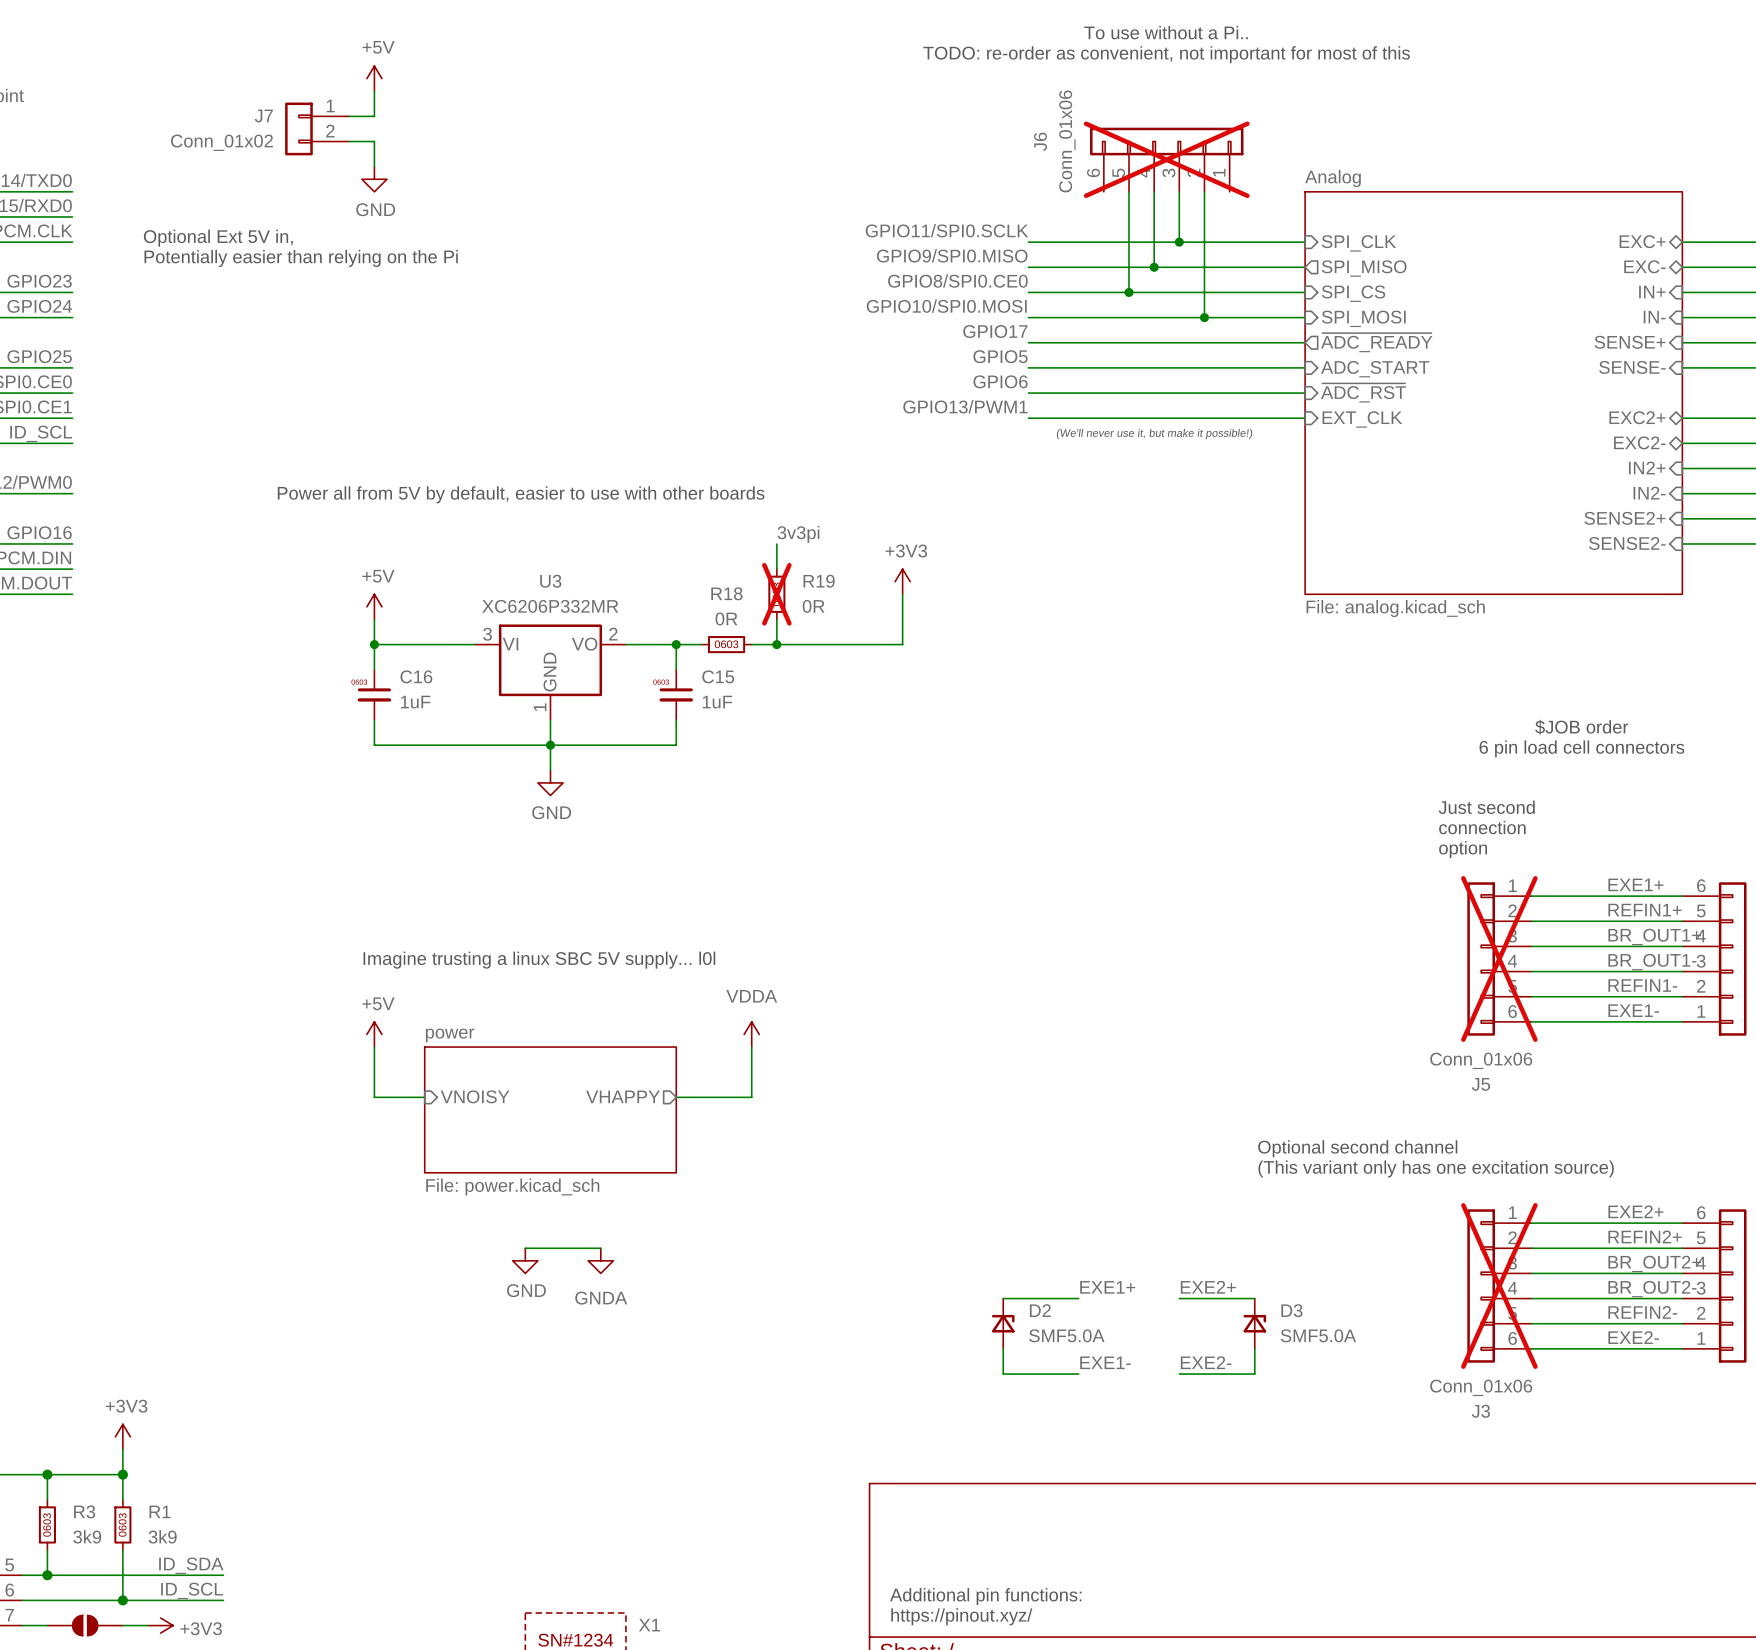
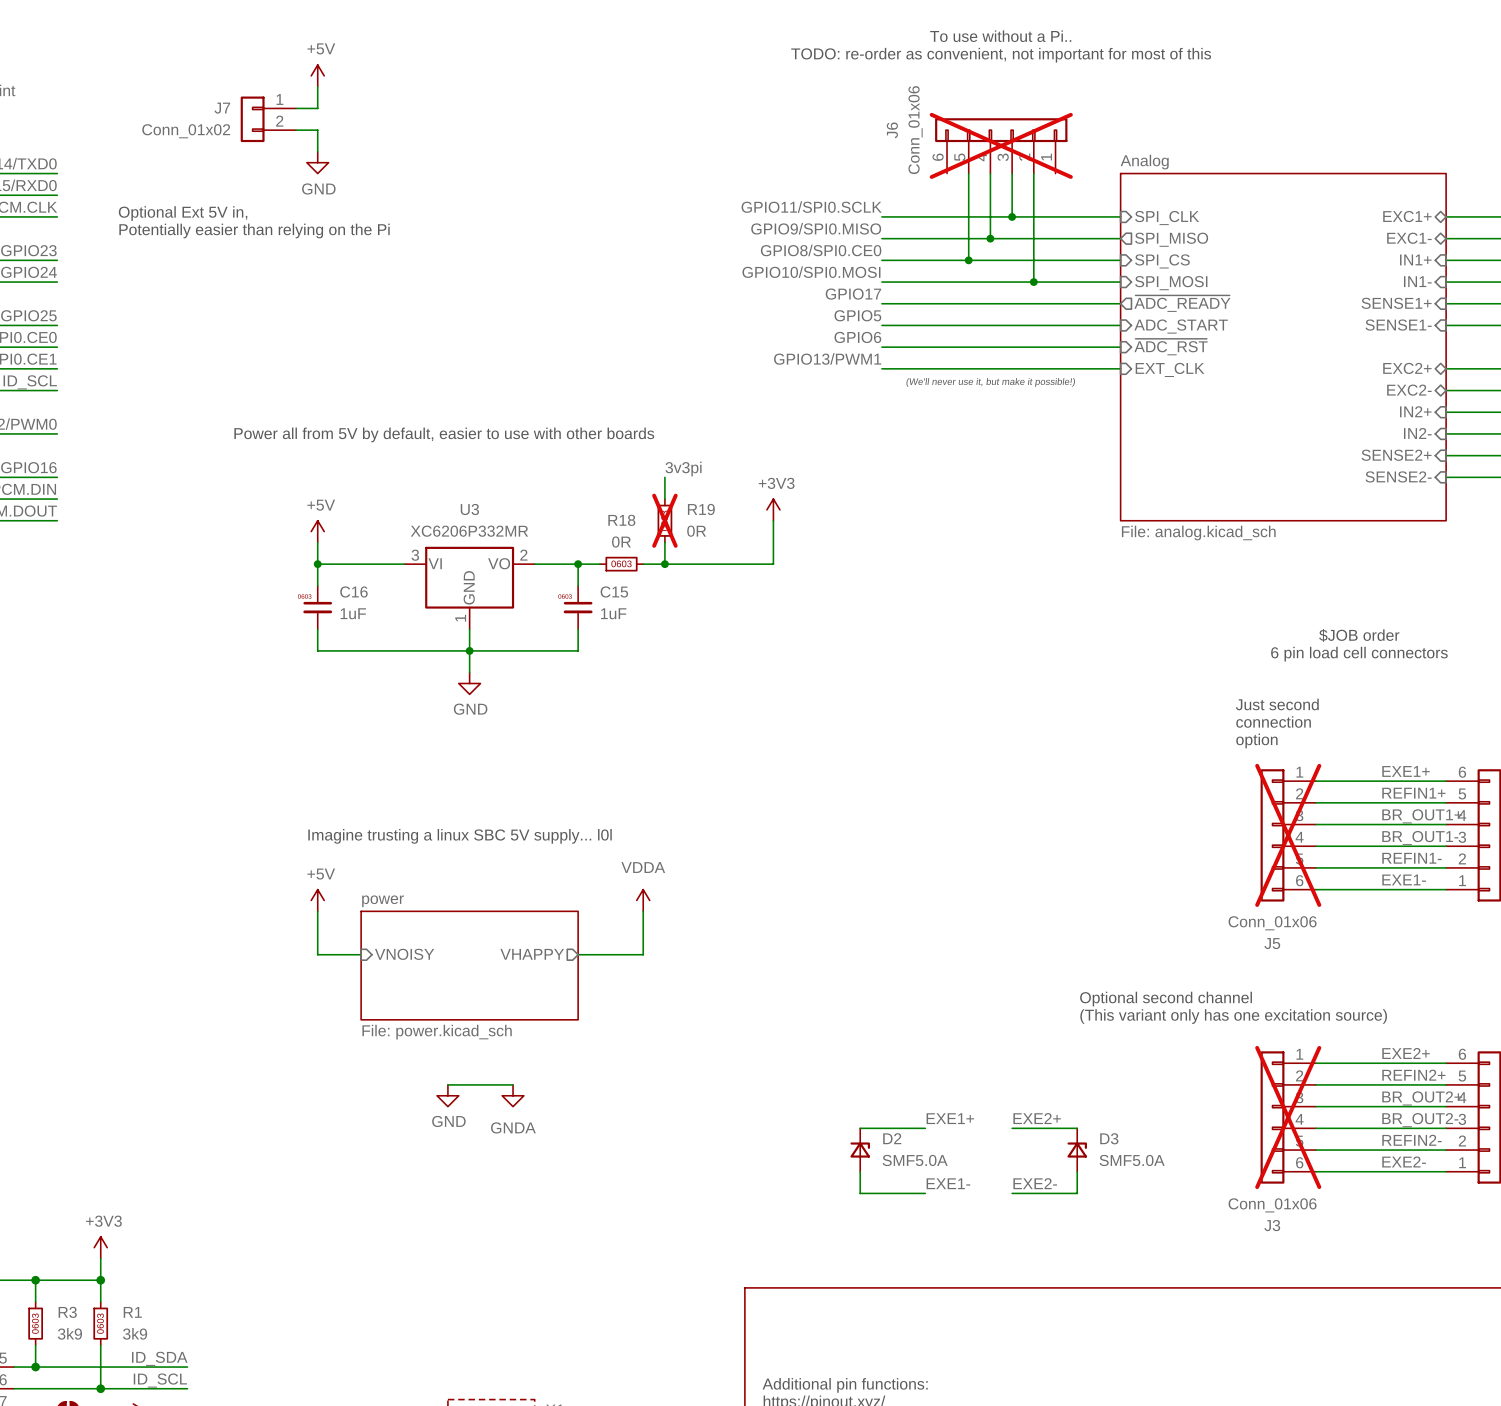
sheet pin: EXC+ (1642, 241) -> EXC1+ (1407, 216)
sheet pin: EXC- (1644, 266) -> EXC1- (1409, 238)
sheet pin: IN+ (1652, 291) -> IN1+ (1415, 259)
sheet pin: IN- (1654, 317) -> IN1- (1417, 281)
sheet pin: SENSE+ (1630, 342) -> SENSE1+ (1396, 303)
sheet pin: SENSE- (1632, 367) -> SENSE1- (1398, 325)

